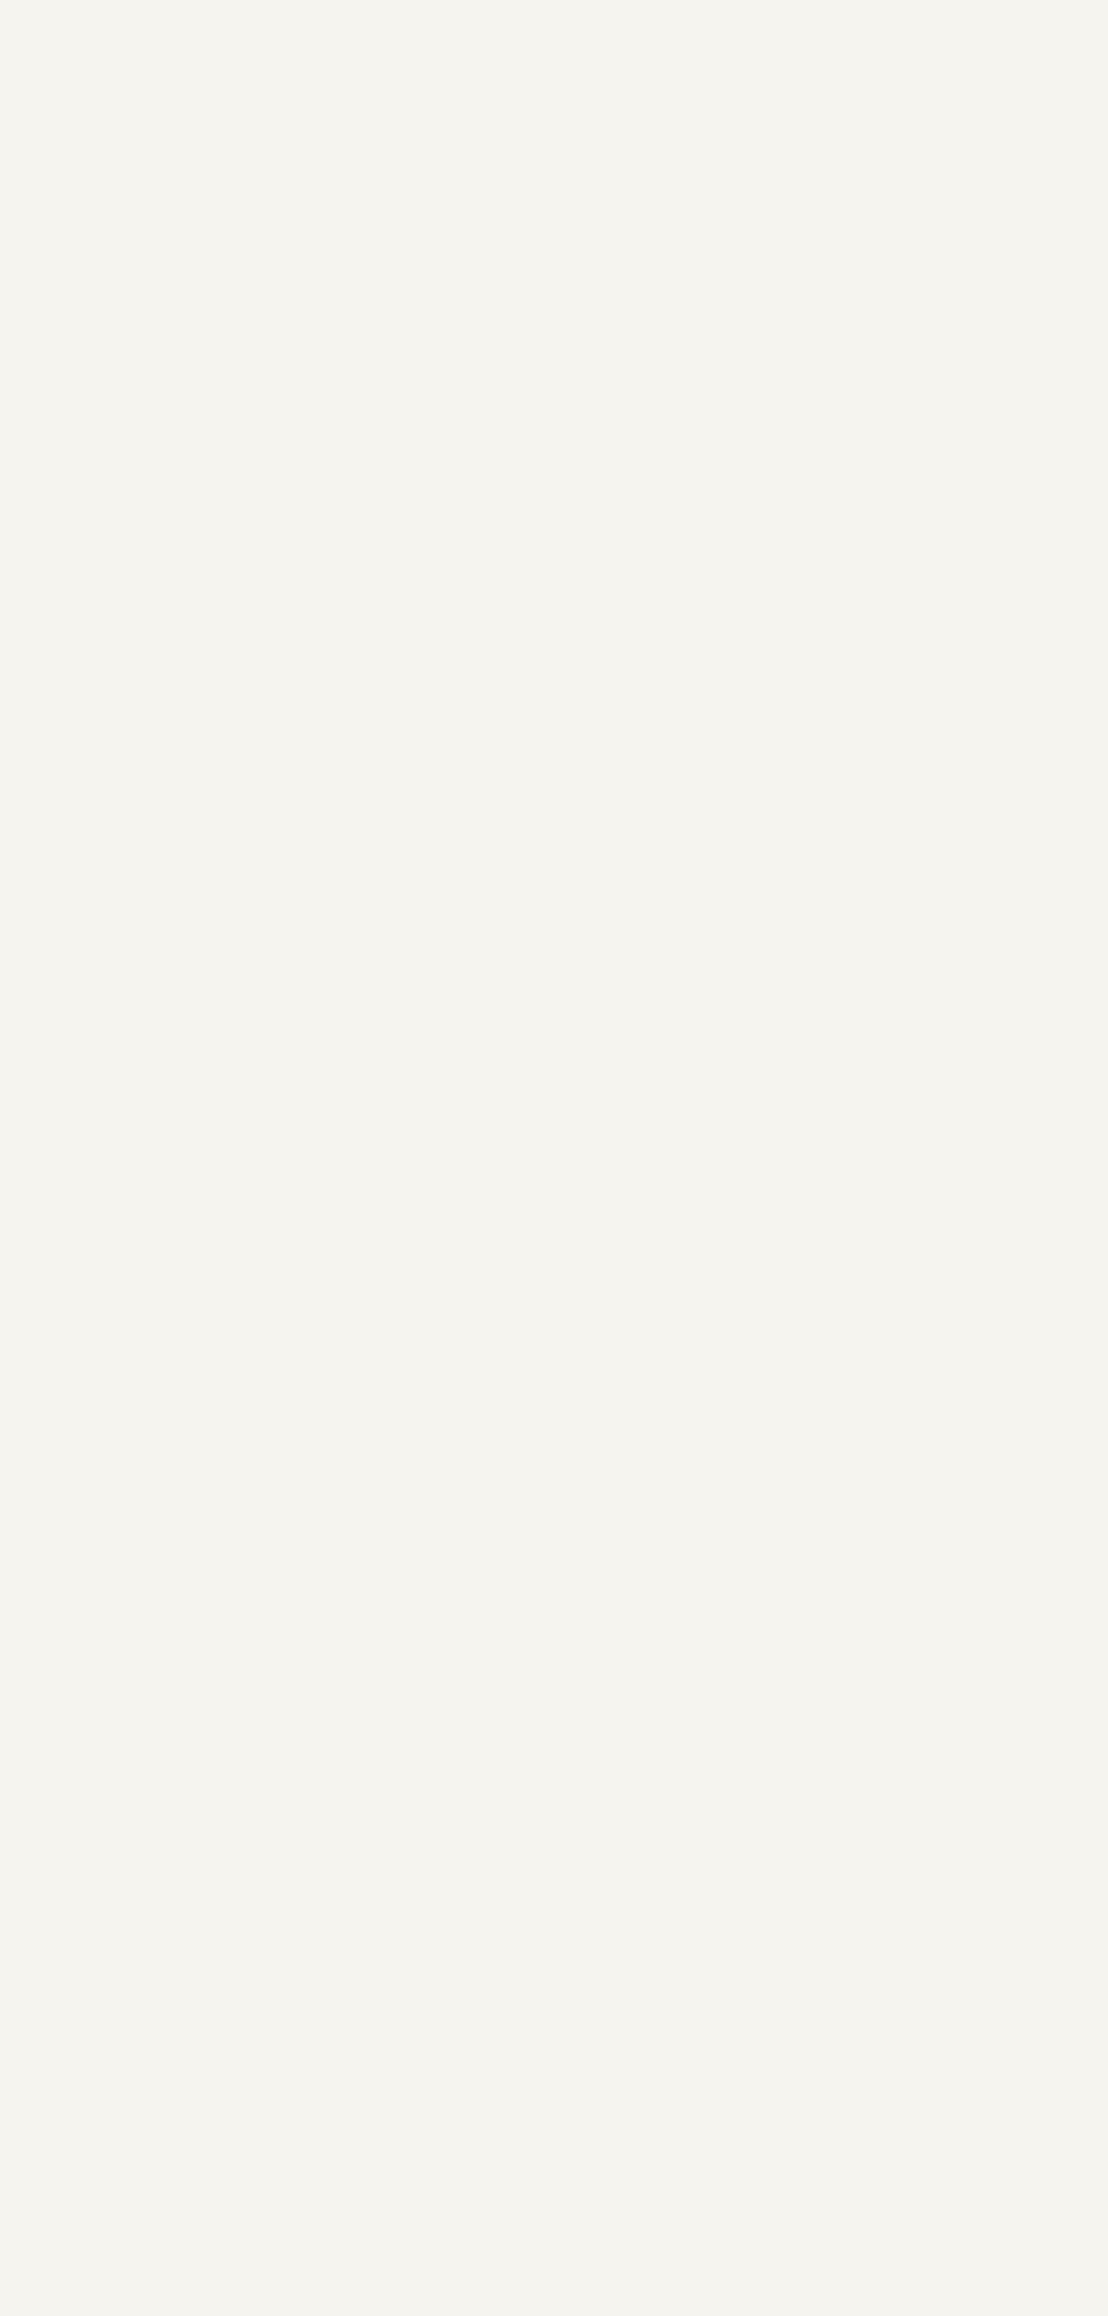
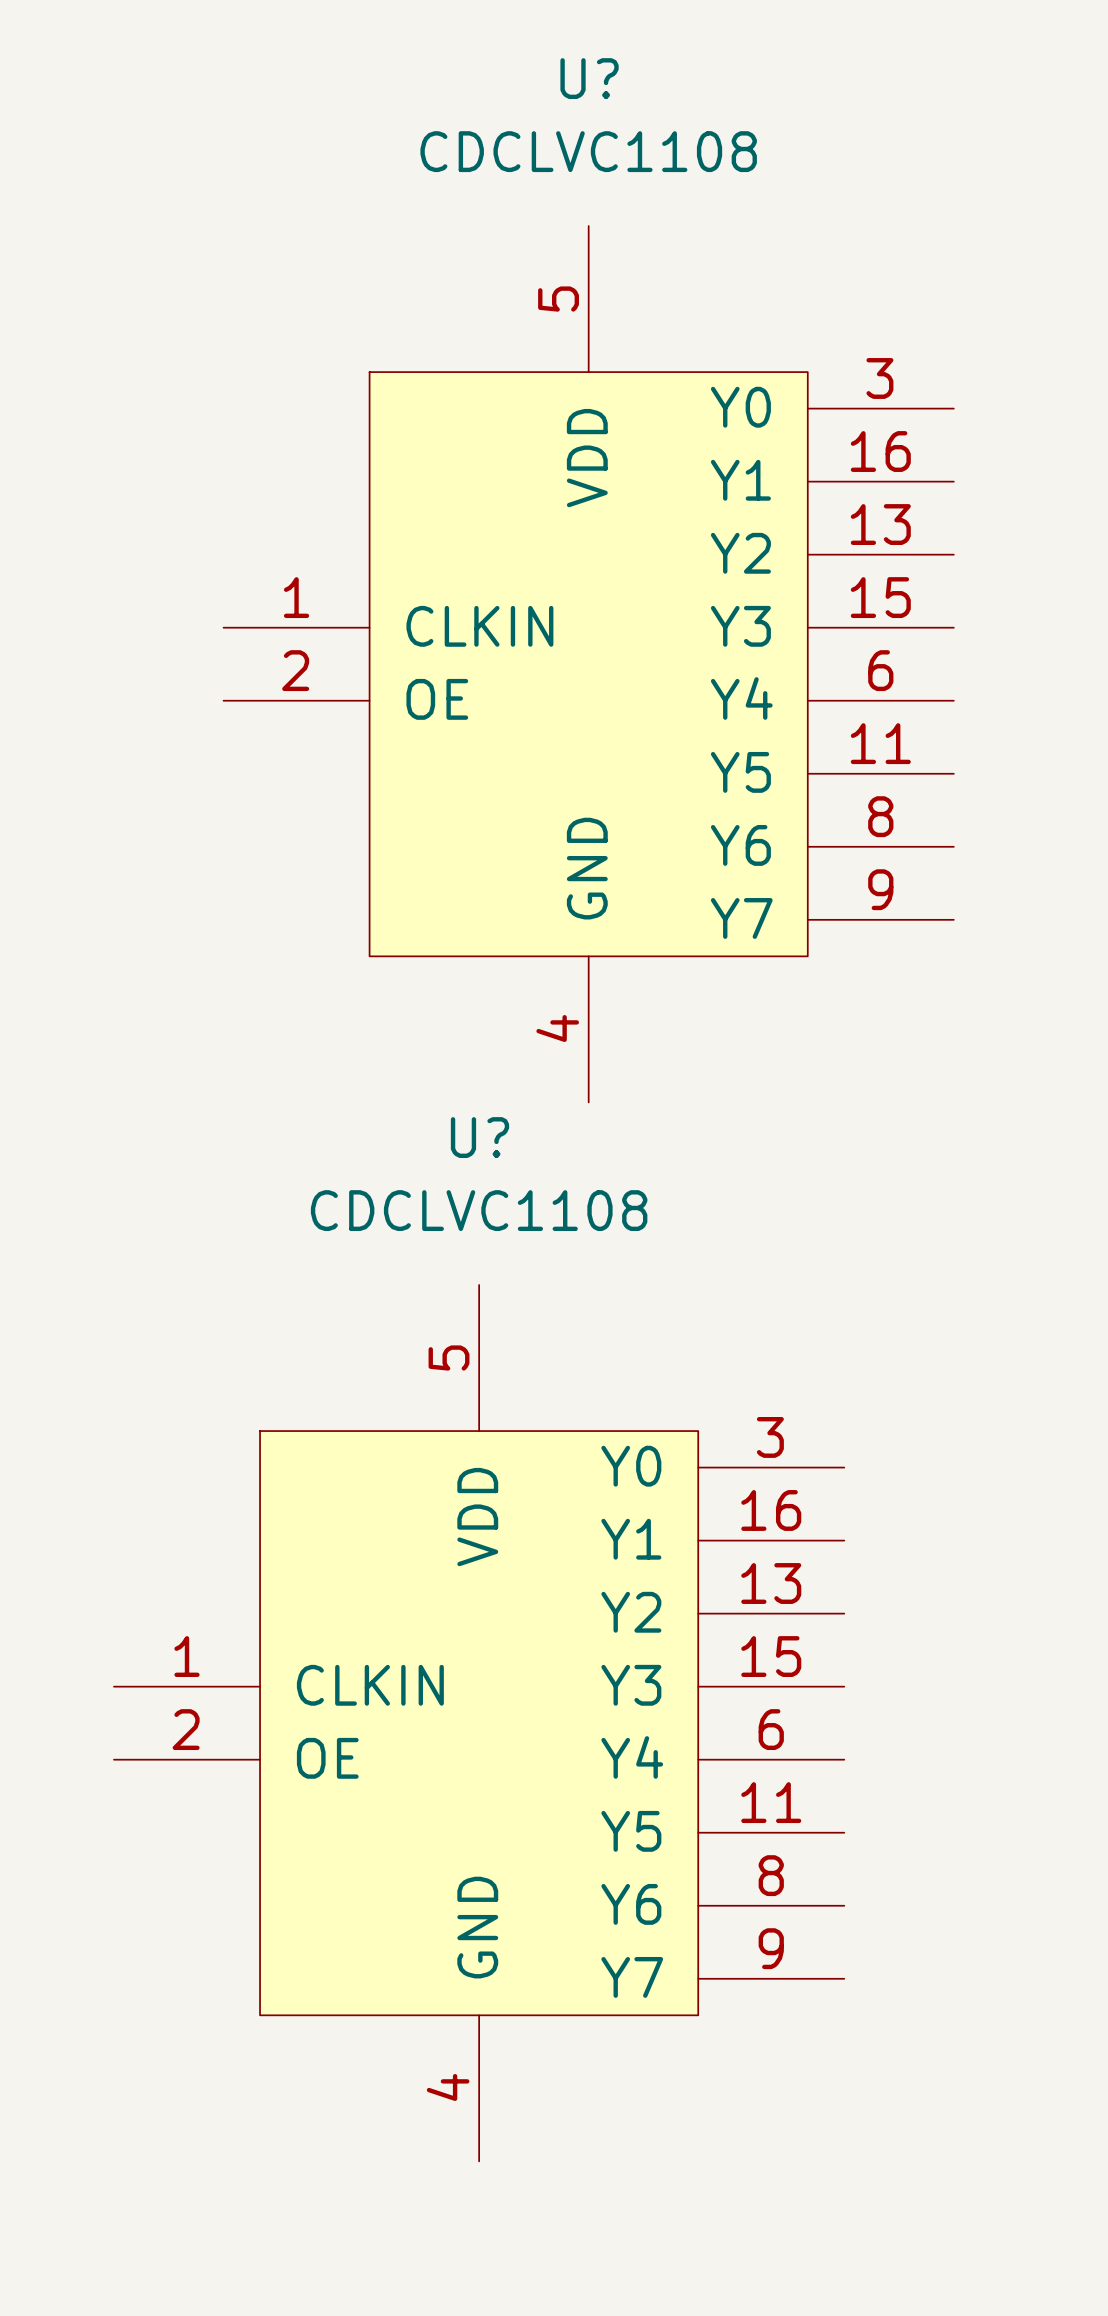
U?: none -> CDCLVC1108 (588, 664)
U?: none -> CDCLVC1108 (479, 1723)

